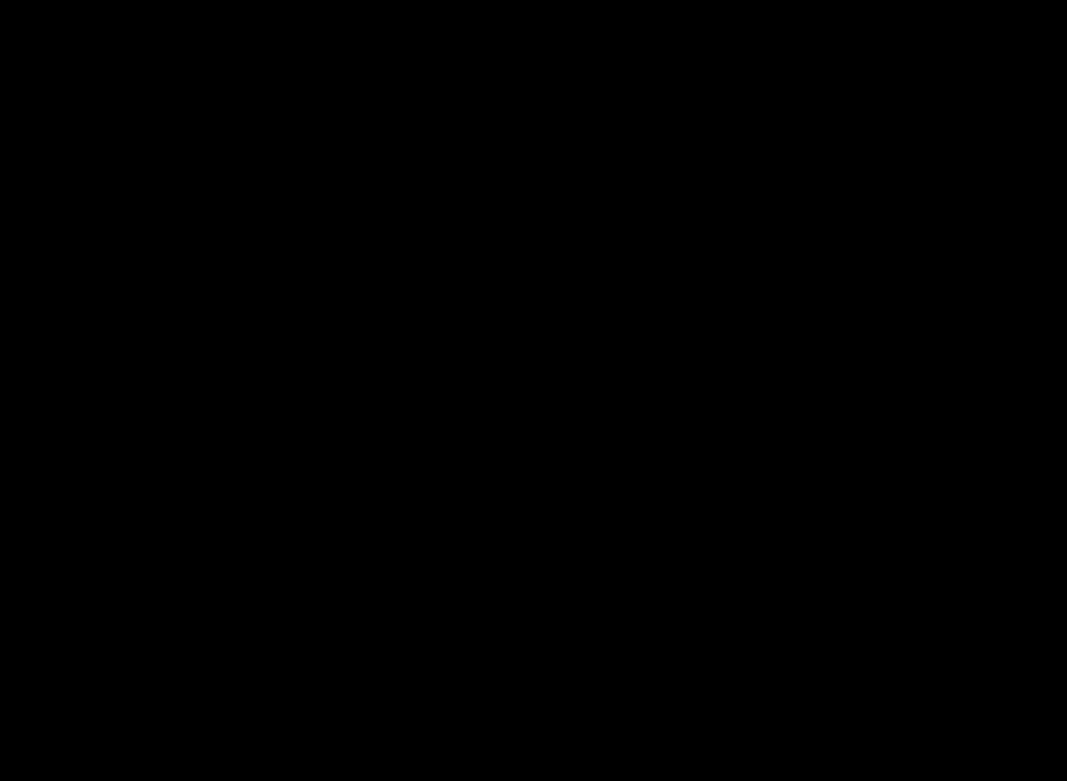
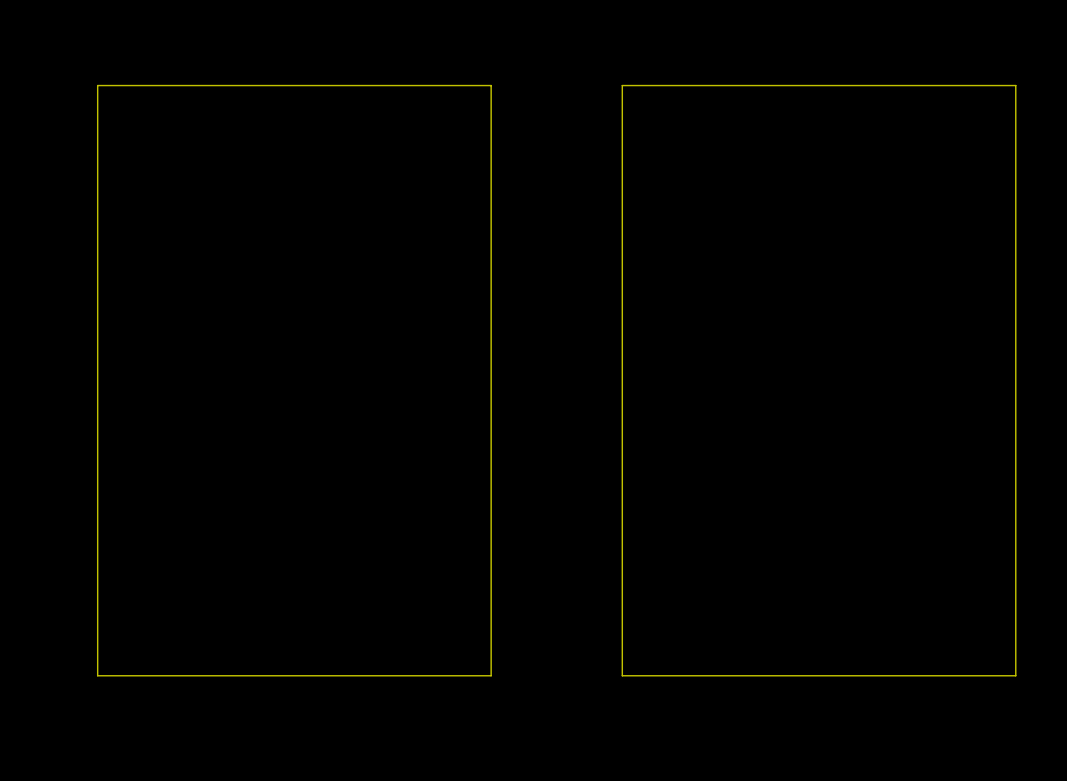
board edge: none -> (491, 85) (491, 675) (97, 675) (97, 85) (491, 85)
board edge: none -> (1015, 85) (1015, 675) (622, 675) (622, 85) (1015, 85)

